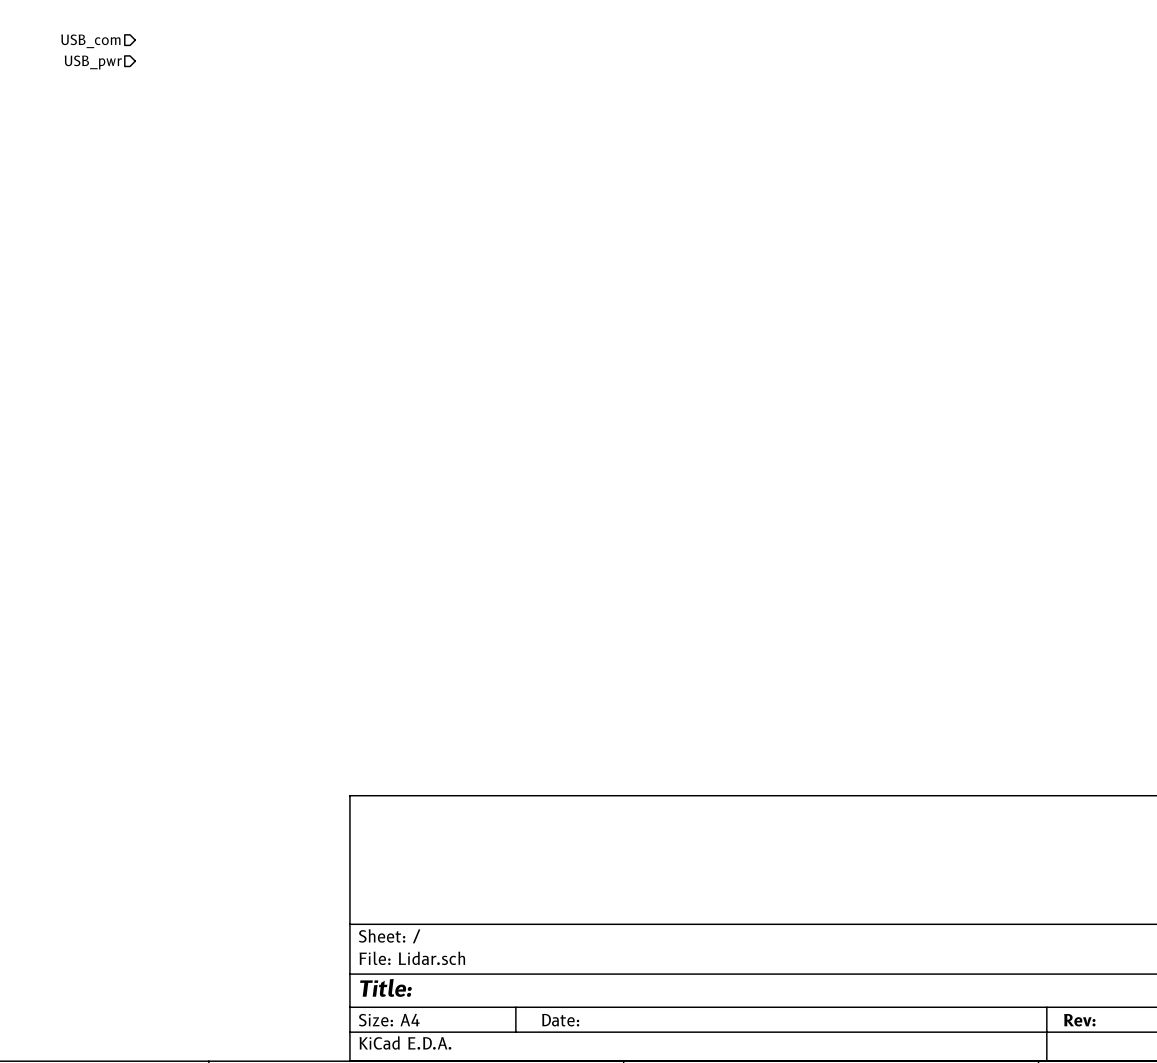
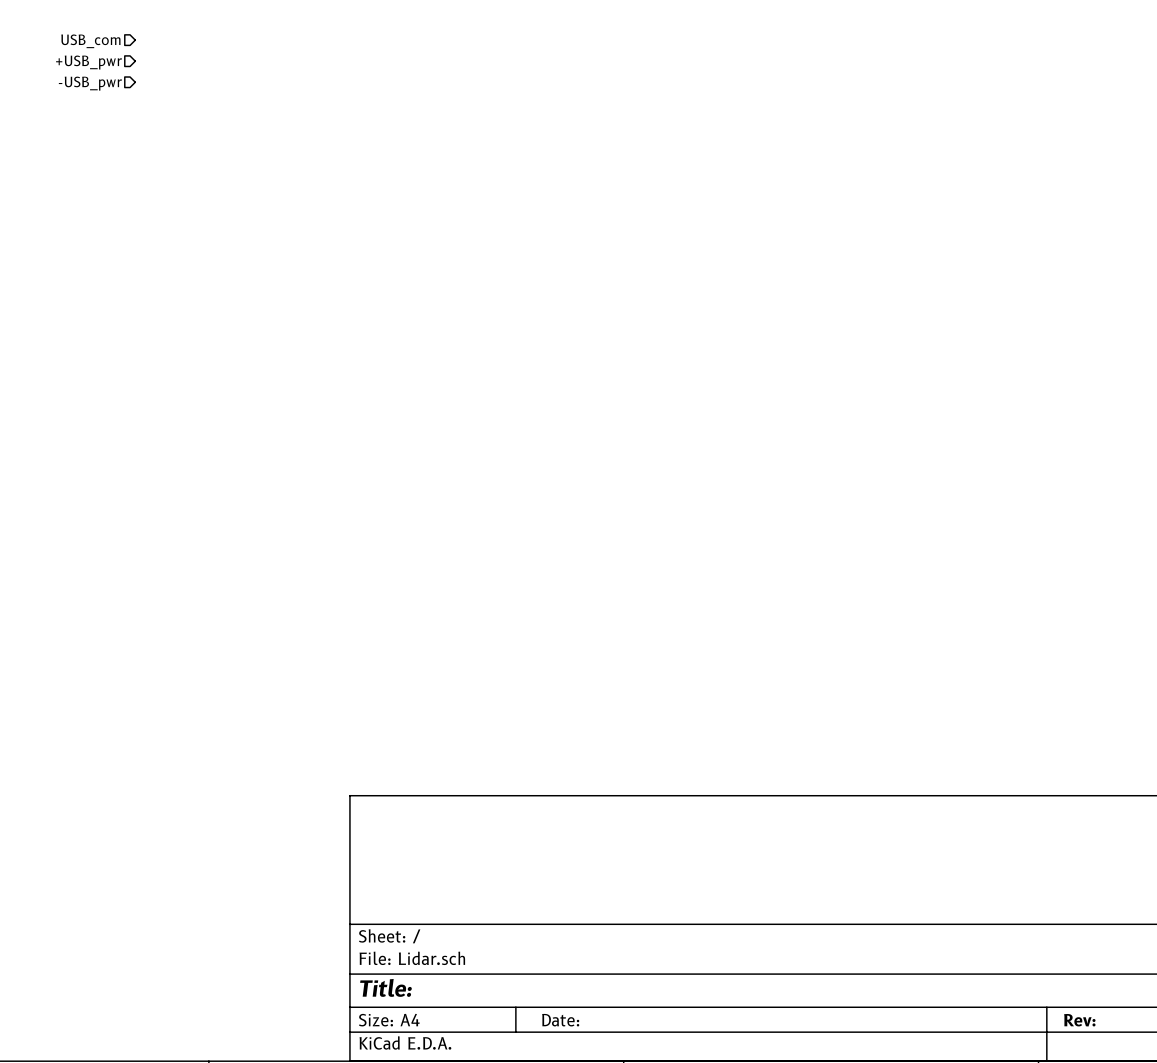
hierarchical label: USB_pwr (93, 62) -> +USB_pwr (89, 62)
hierarchical label: none -> -USB_pwr (90, 83)

